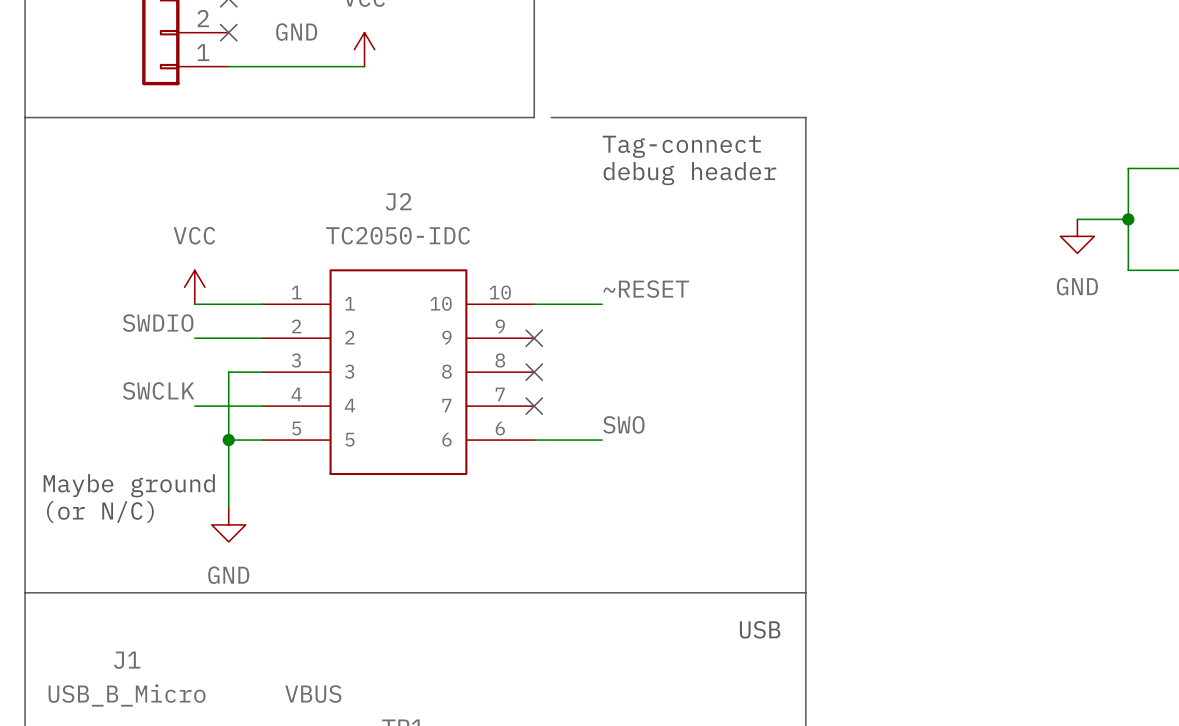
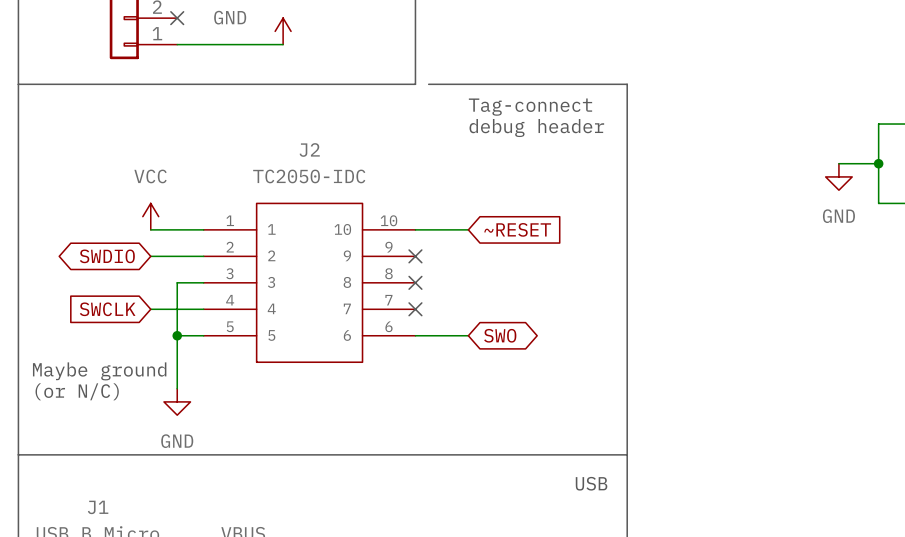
label: ~RESET (646, 289) -> none
global label: none -> ~RESET (517, 229)
label: SWDIO (158, 323) -> none
global label: none -> SWDIO (107, 256)
label: SWCLK (158, 390) -> none
global label: none -> SWCLK (107, 309)
label: SWO (623, 424) -> none
global label: none -> SWO (500, 335)

